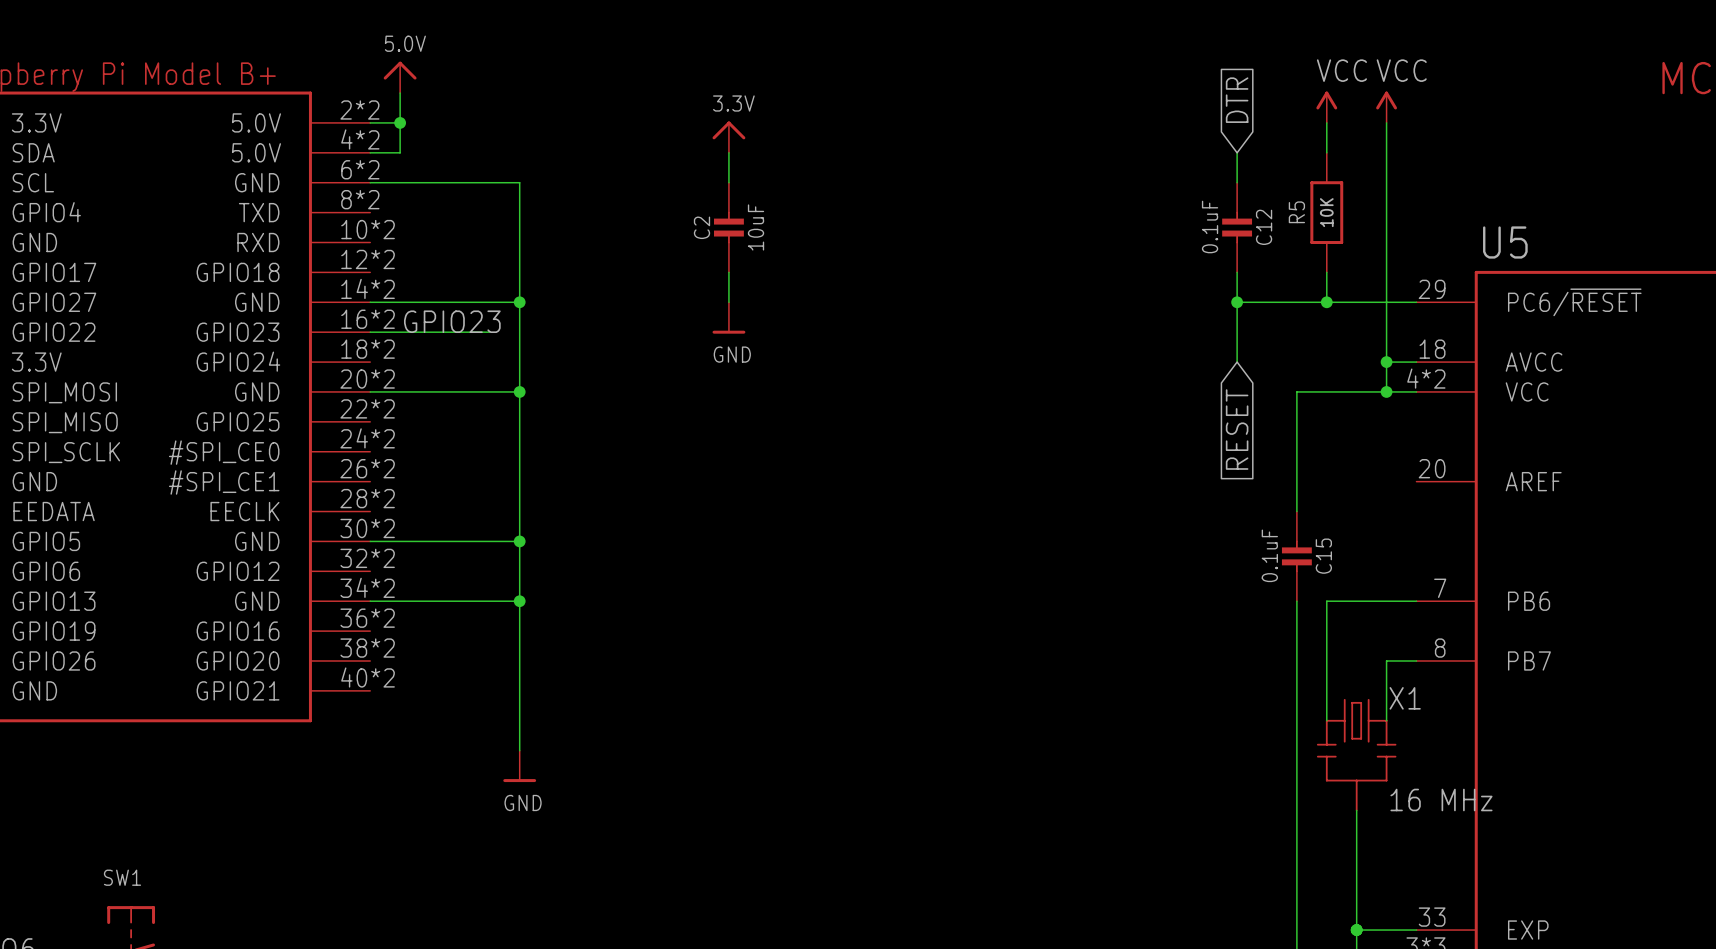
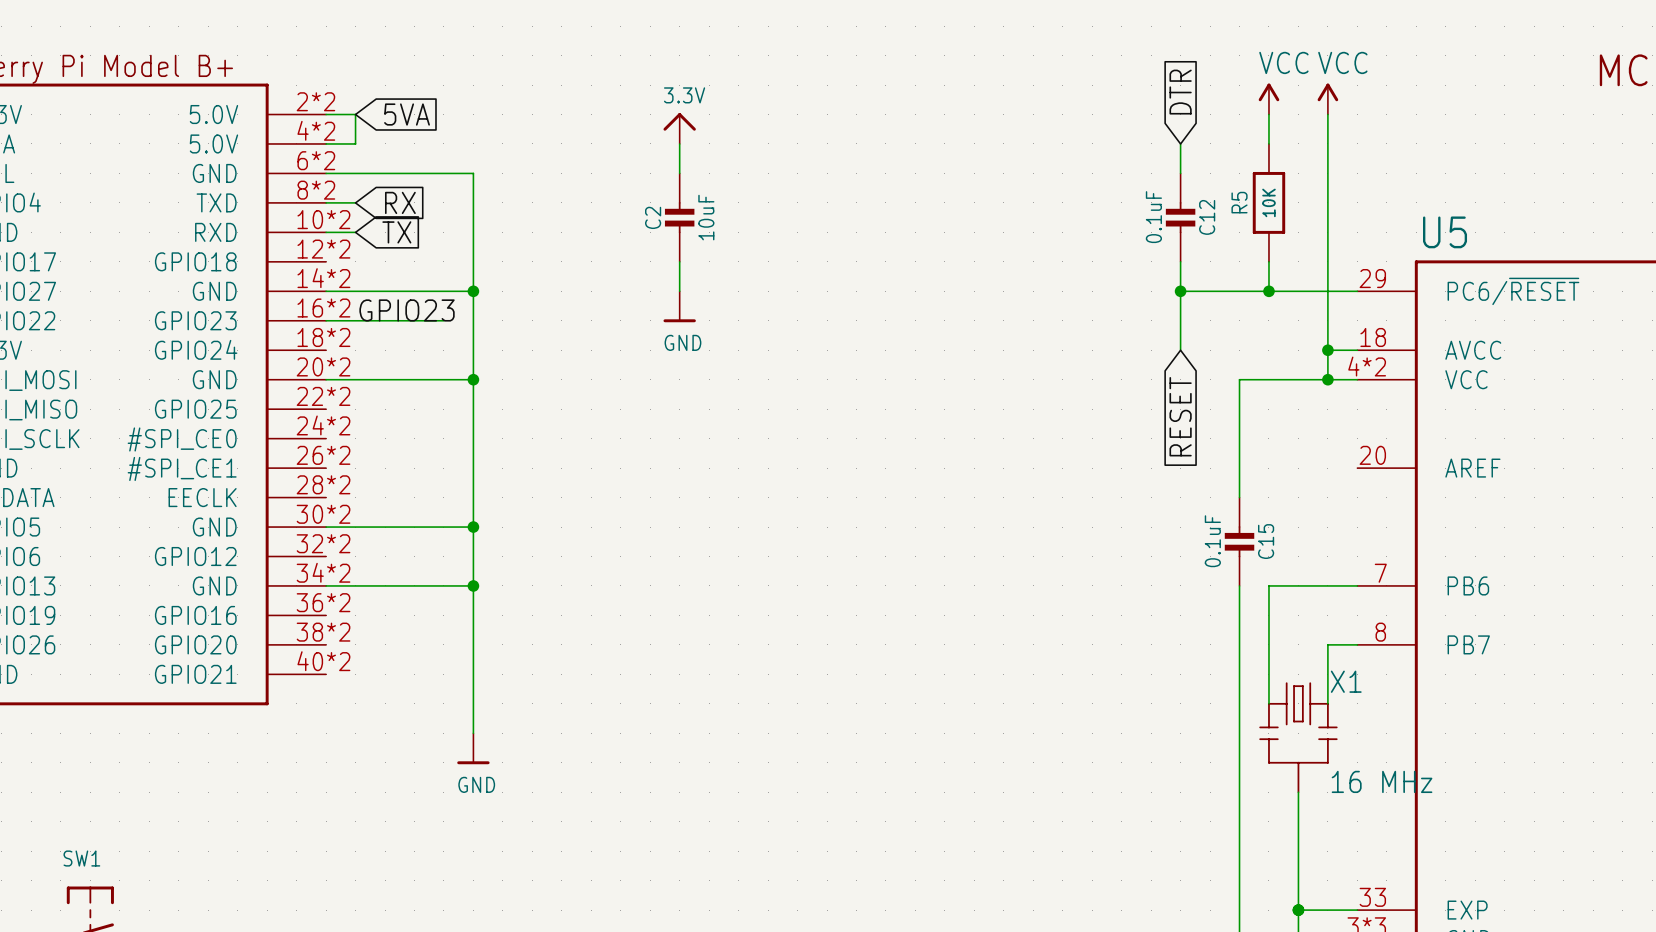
power symbol: 5.0V (400, 77) -> none
wire: (400, 93) (400, 122) -> none
junction: (400, 122) -> none
global label: none -> 5VA (407, 114)
wire: none -> (326, 202) (355, 202)
global label: none -> RX (400, 202)
wire: none -> (326, 232) (355, 232)
global label: none -> TX (396, 232)

